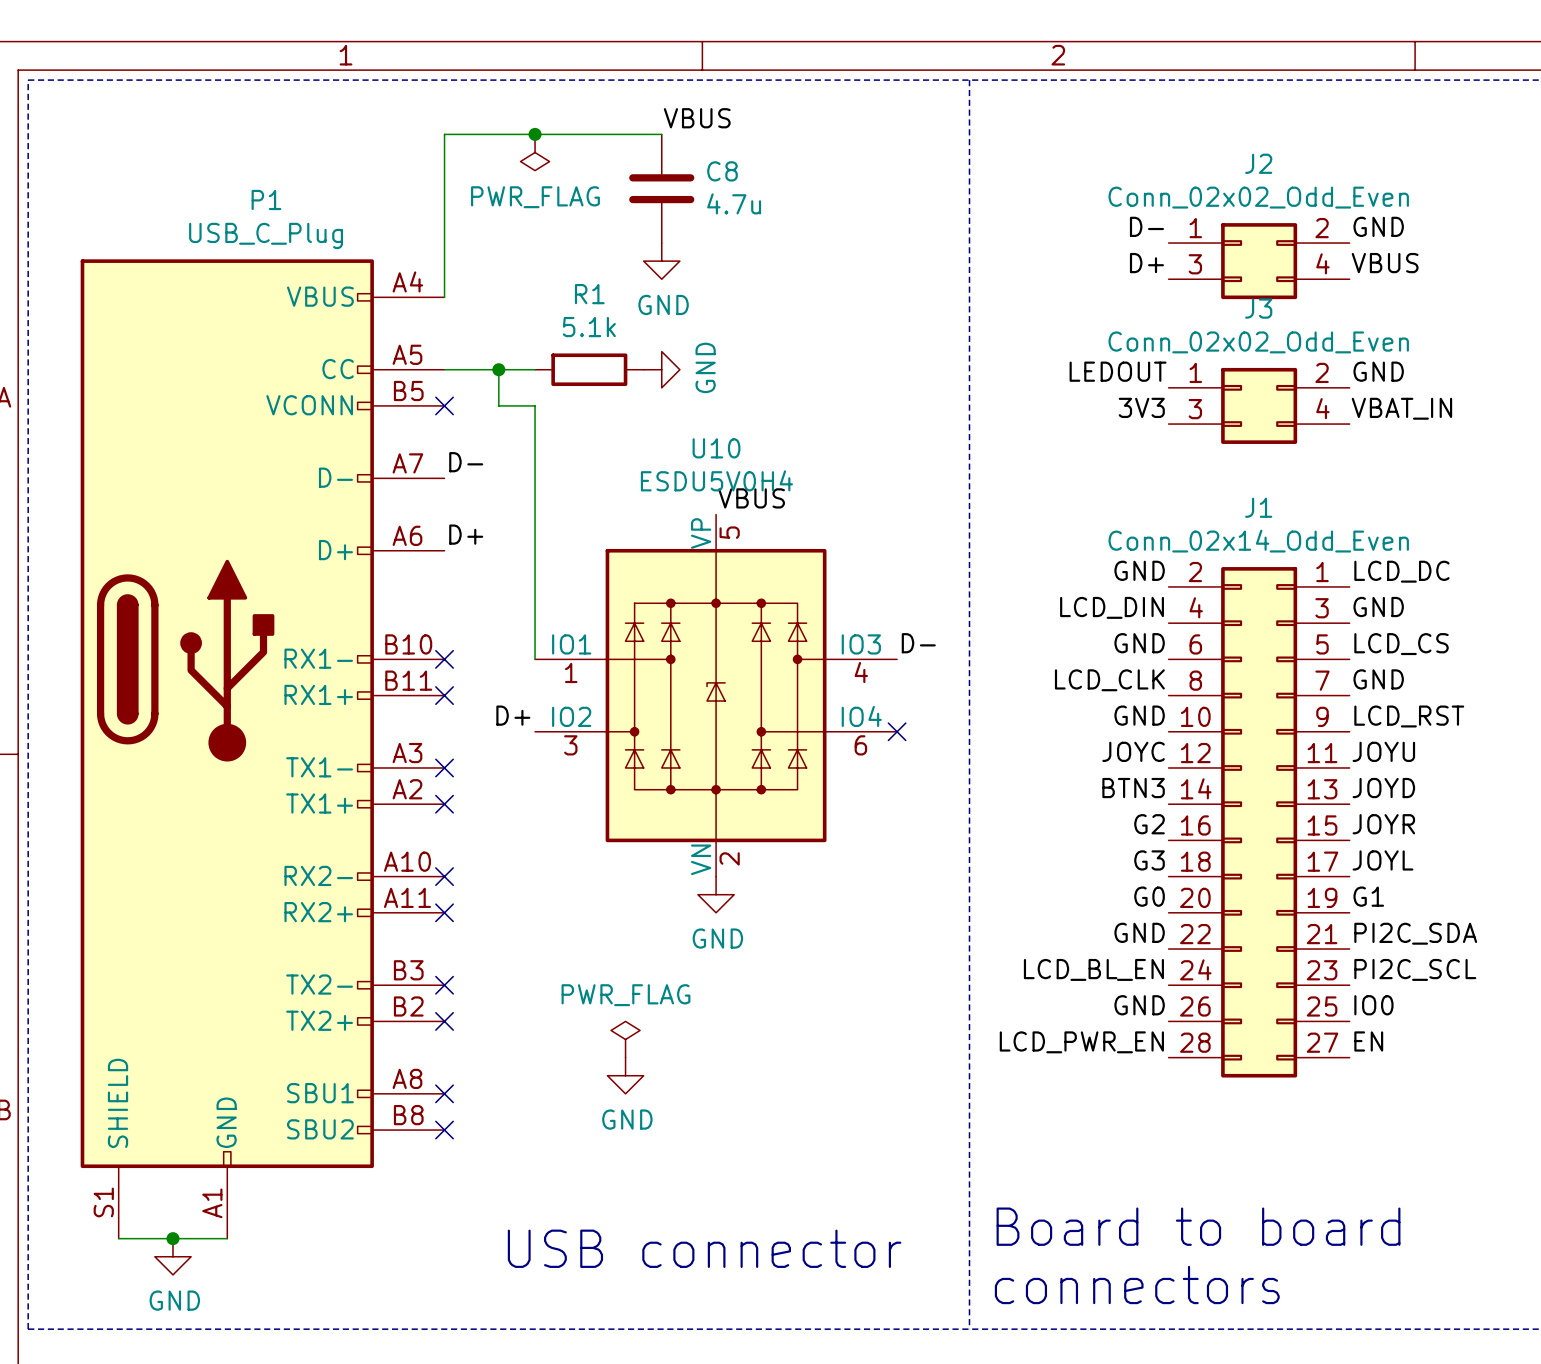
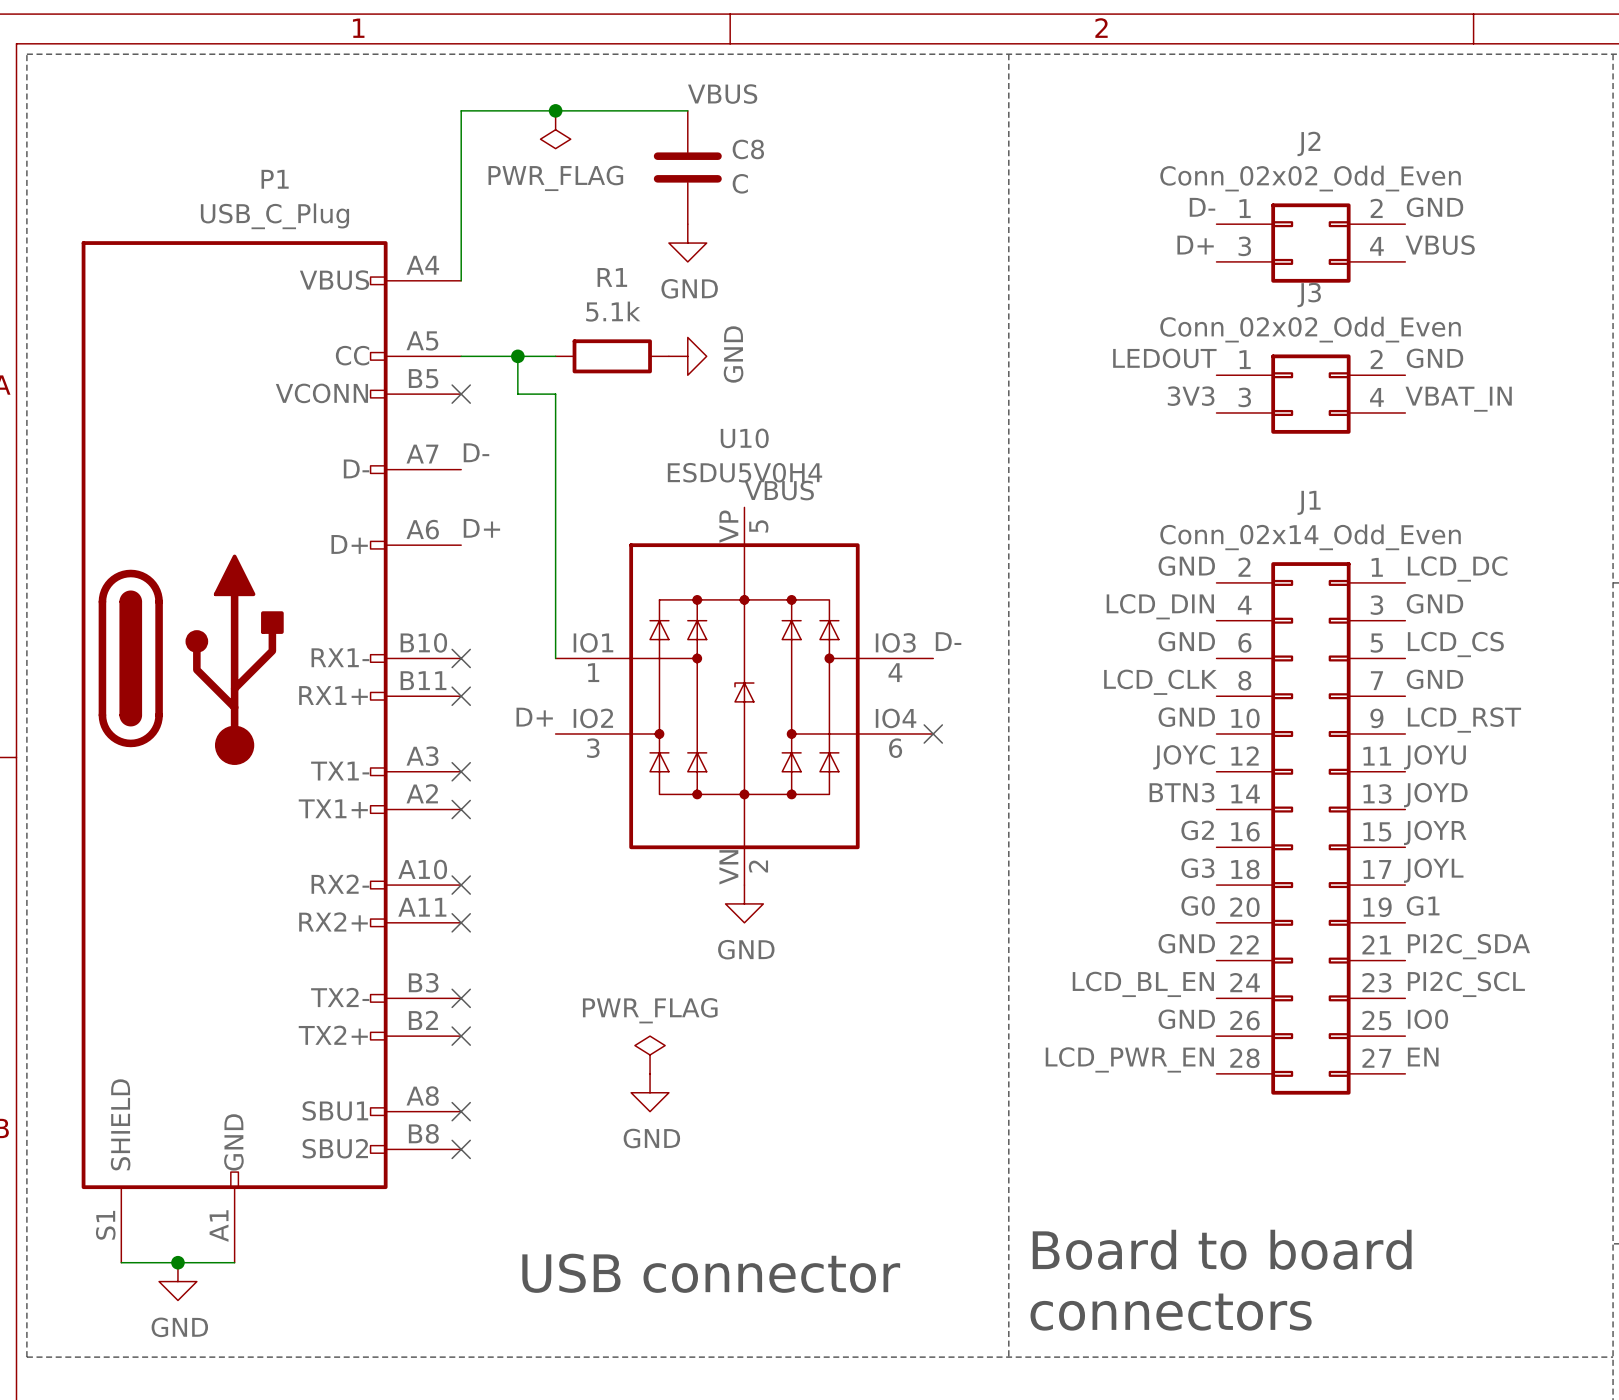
C8 value: 4.7u (734, 203) -> C (740, 183)

